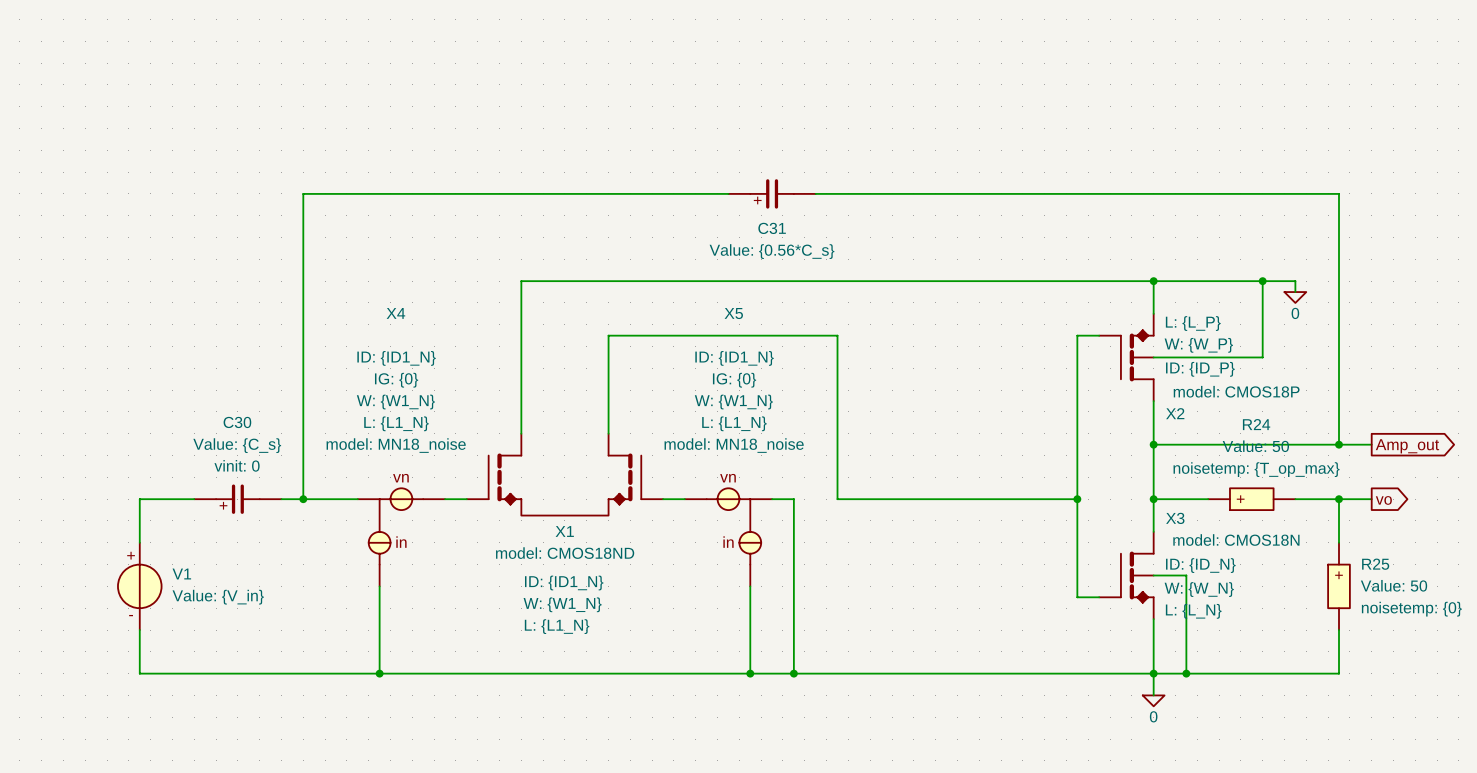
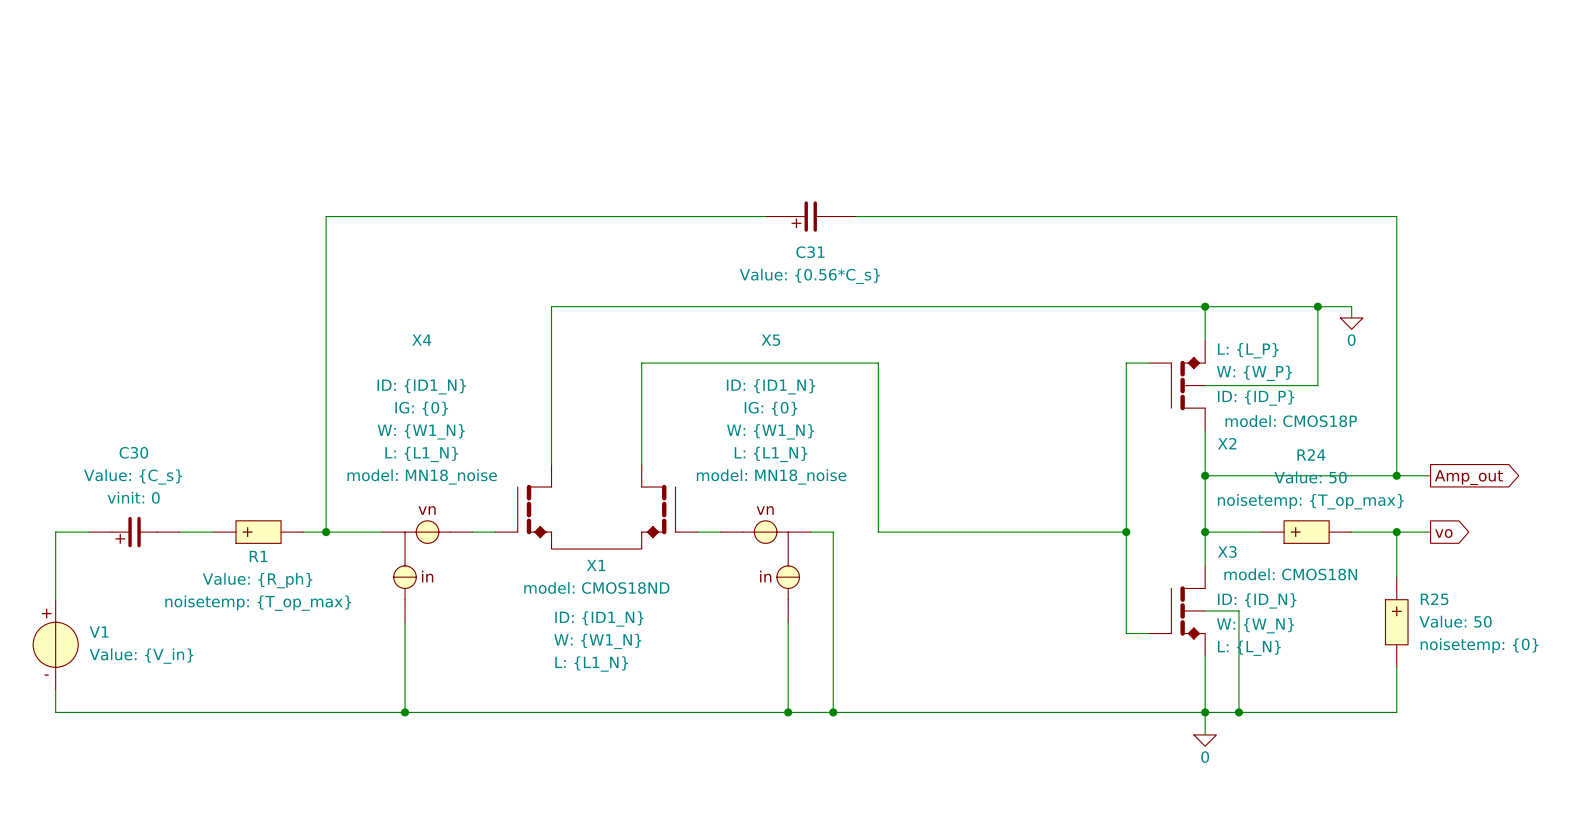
wire: none -> (89, 532) (55, 532) (55, 599)
wire: (161, 499) (139, 499) (139, 542) -> none
C30 position: (237, 499) -> (134, 532)
R1: none -> Value: {R_ph} (258, 532)
V1 position: (139, 586) -> (55, 644)
wire: (139, 630) (139, 673) -> (55, 689) (55, 712) (157, 712)

